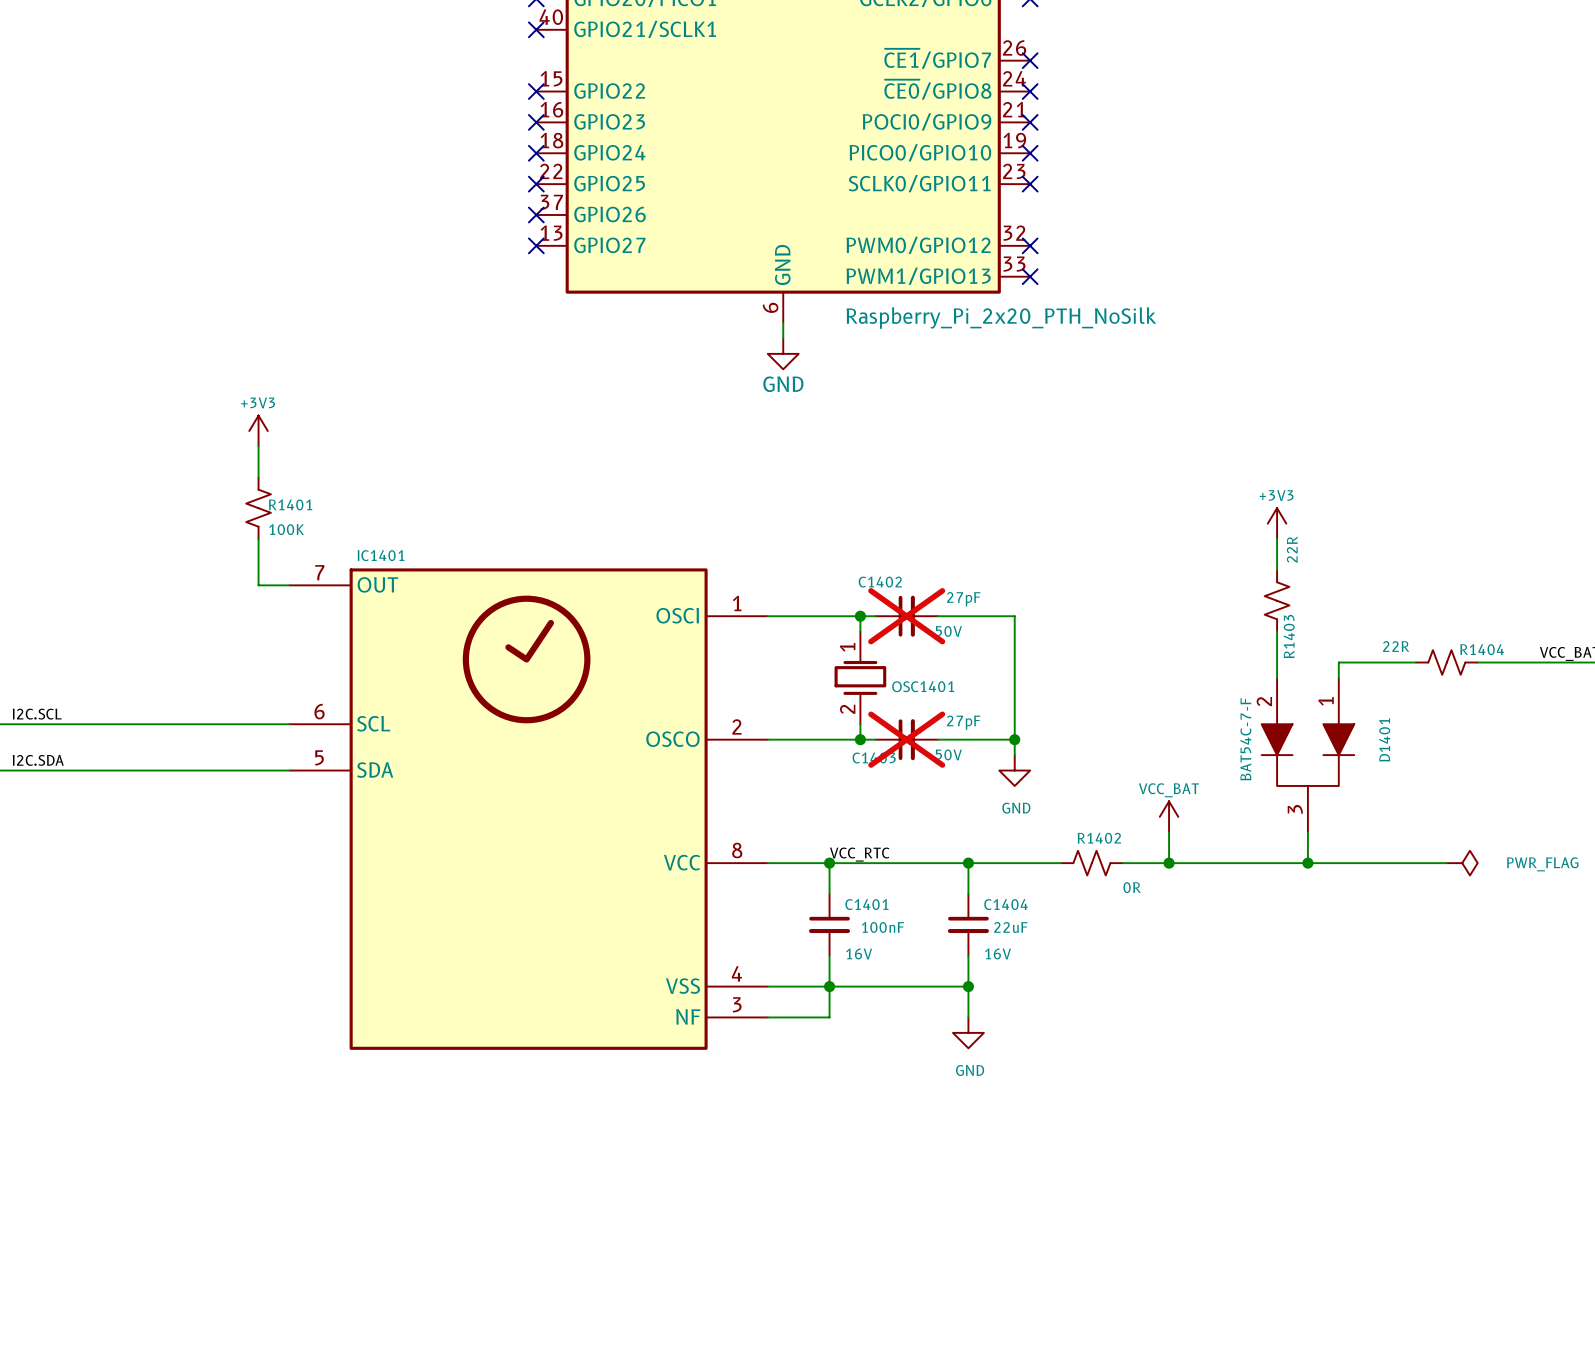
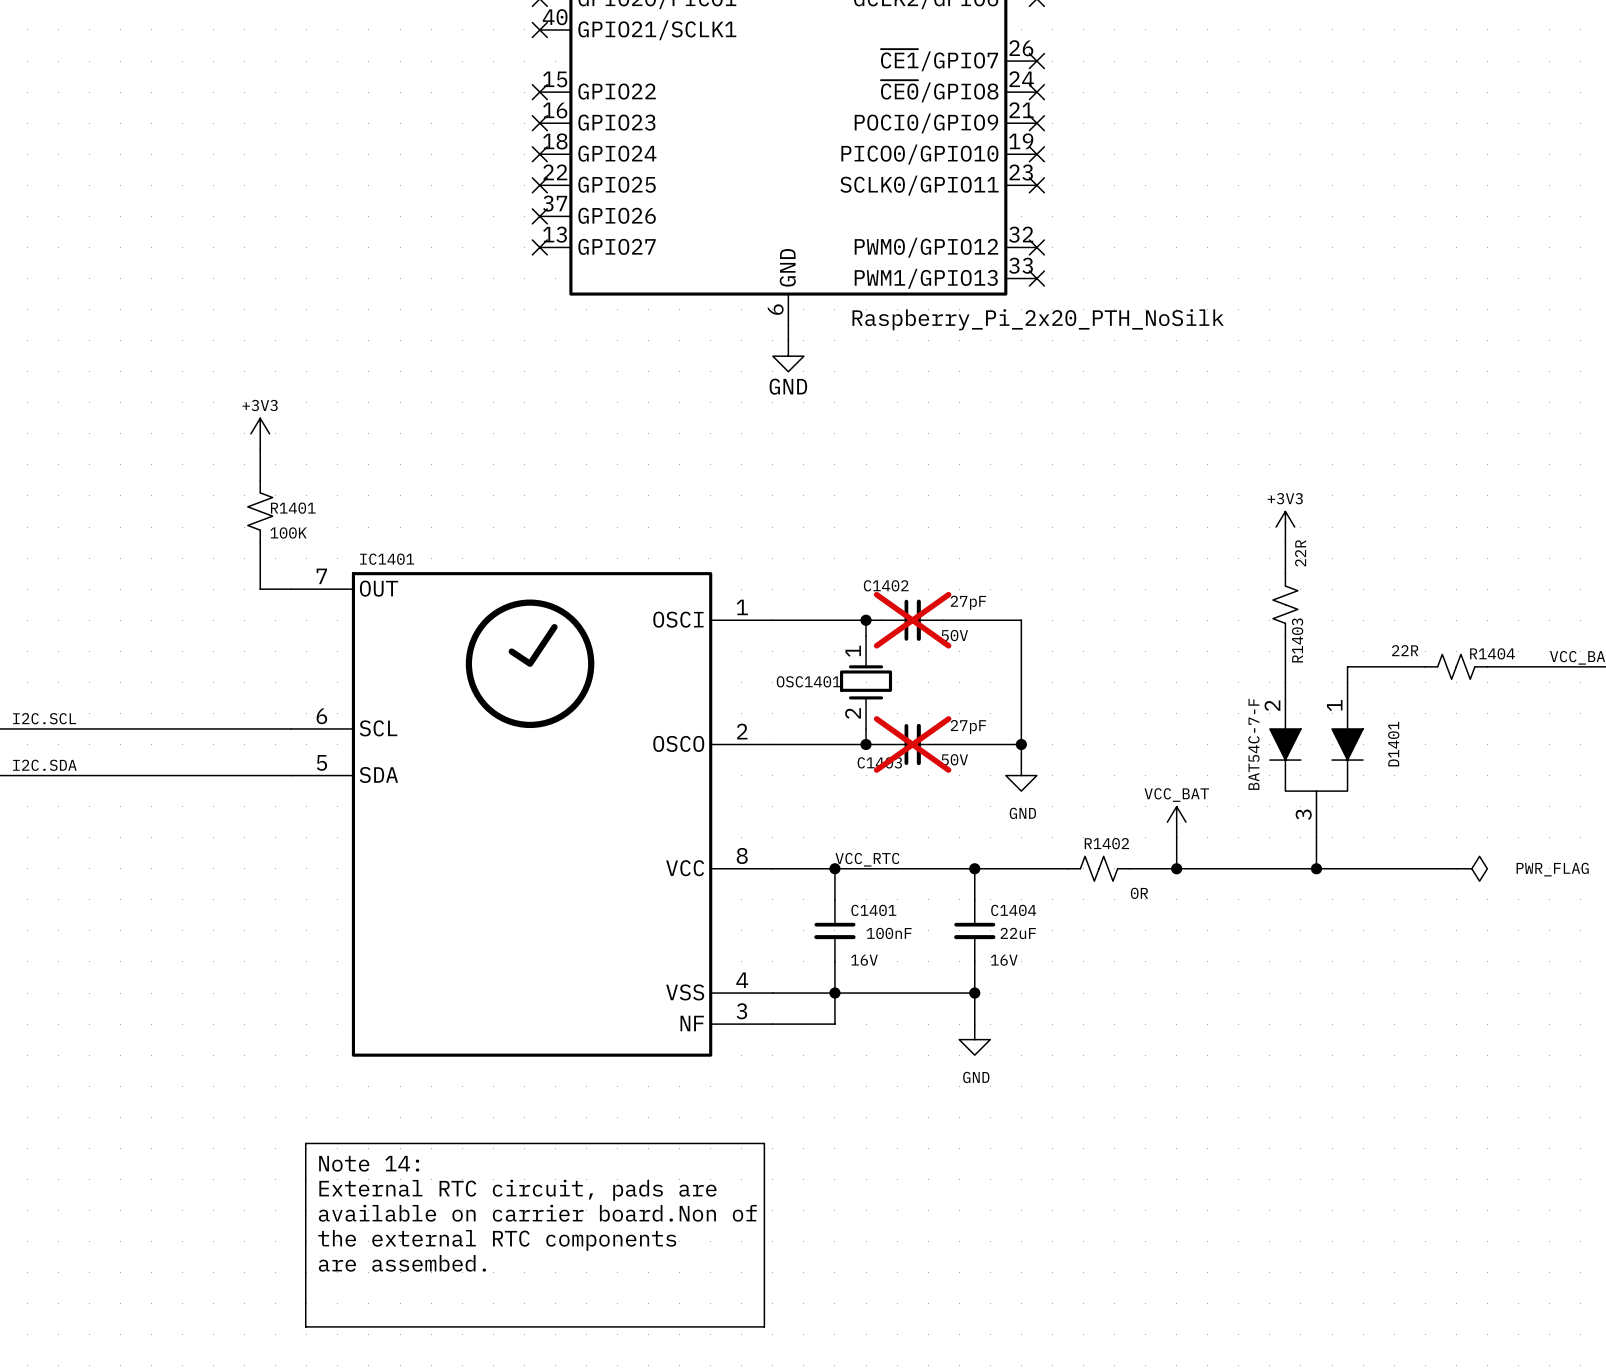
OSC1401 name position: OSC1401 (923, 686) -> OSC1401 (808, 681)
line: none -> (305, 1143) (764, 1143) (764, 1326) (305, 1326) (305, 1143)
text: none -> Note 14: (369, 1163)
text: none -> External RTC circuit, pads are (517, 1190)
text: none -> available on carrier board.Non of (537, 1213)
text: none -> the external RTC components (497, 1240)
text: none -> are assembed. (402, 1263)

